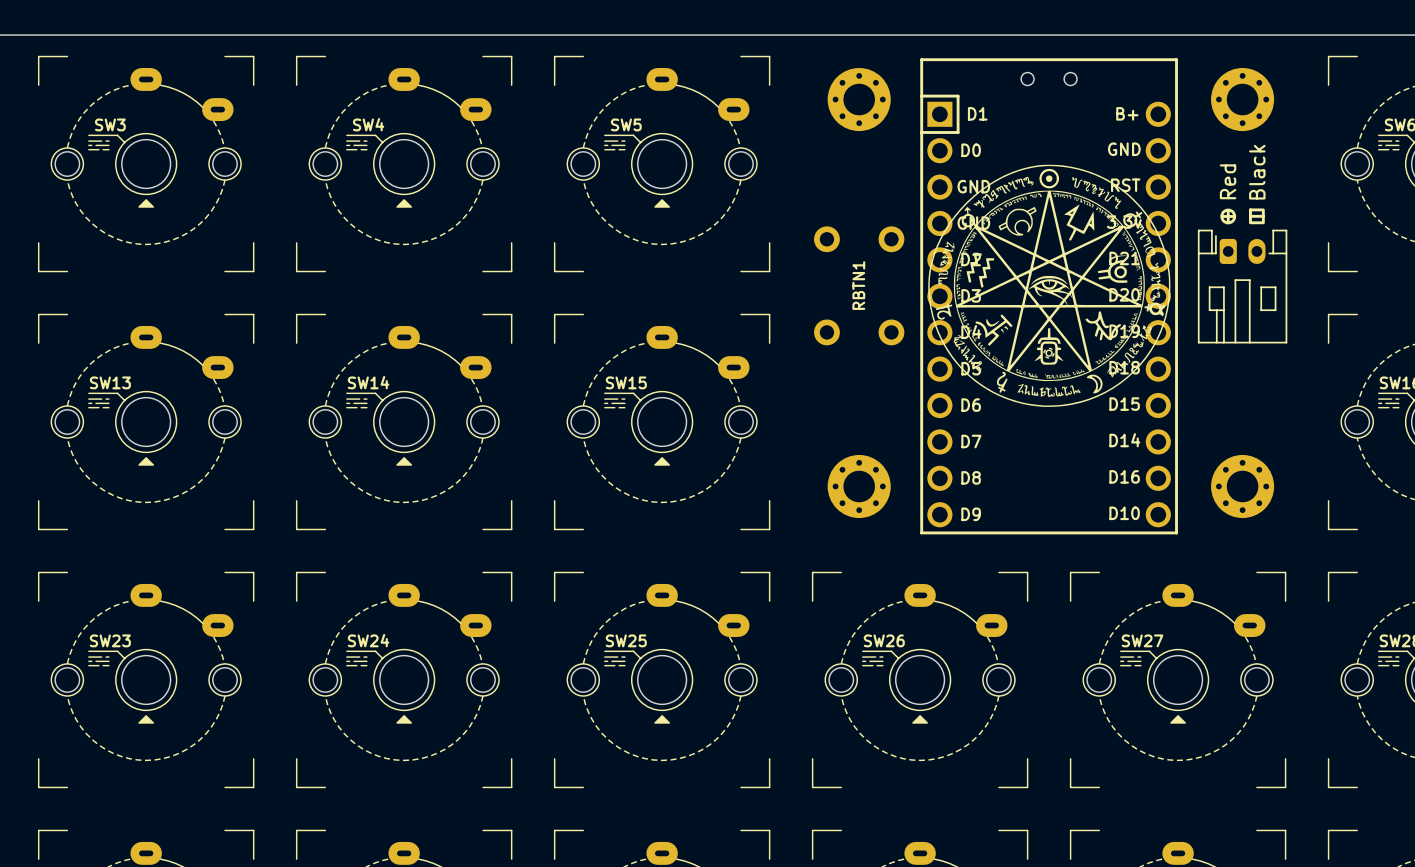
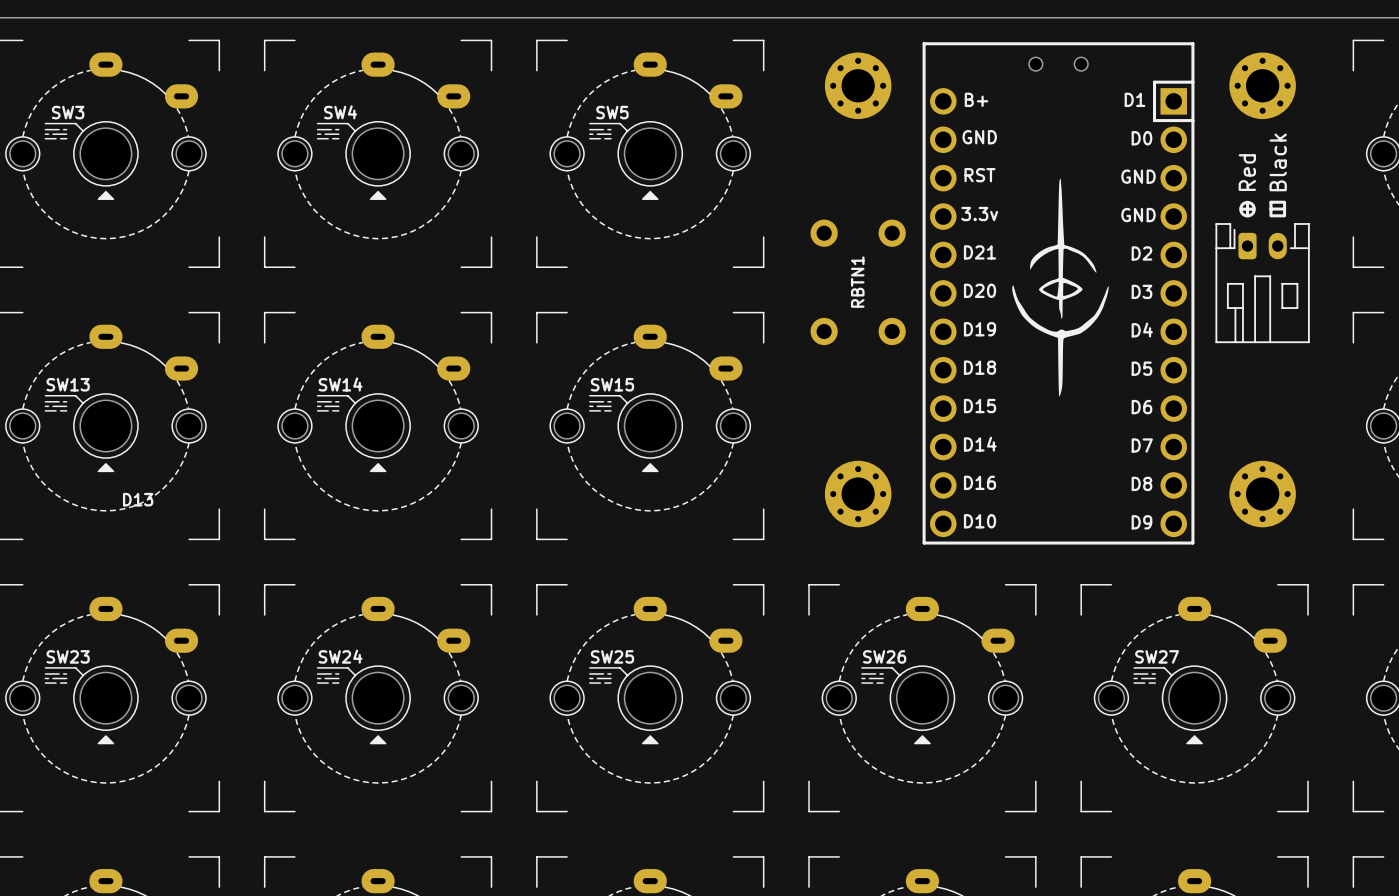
part footprint: [920, 58, 1178, 535] -> [922, 42, 1195, 545]
drawing shape: [928, 164, 1171, 407] -> [1012, 178, 1109, 397]
D13: none -> (138, 499)

